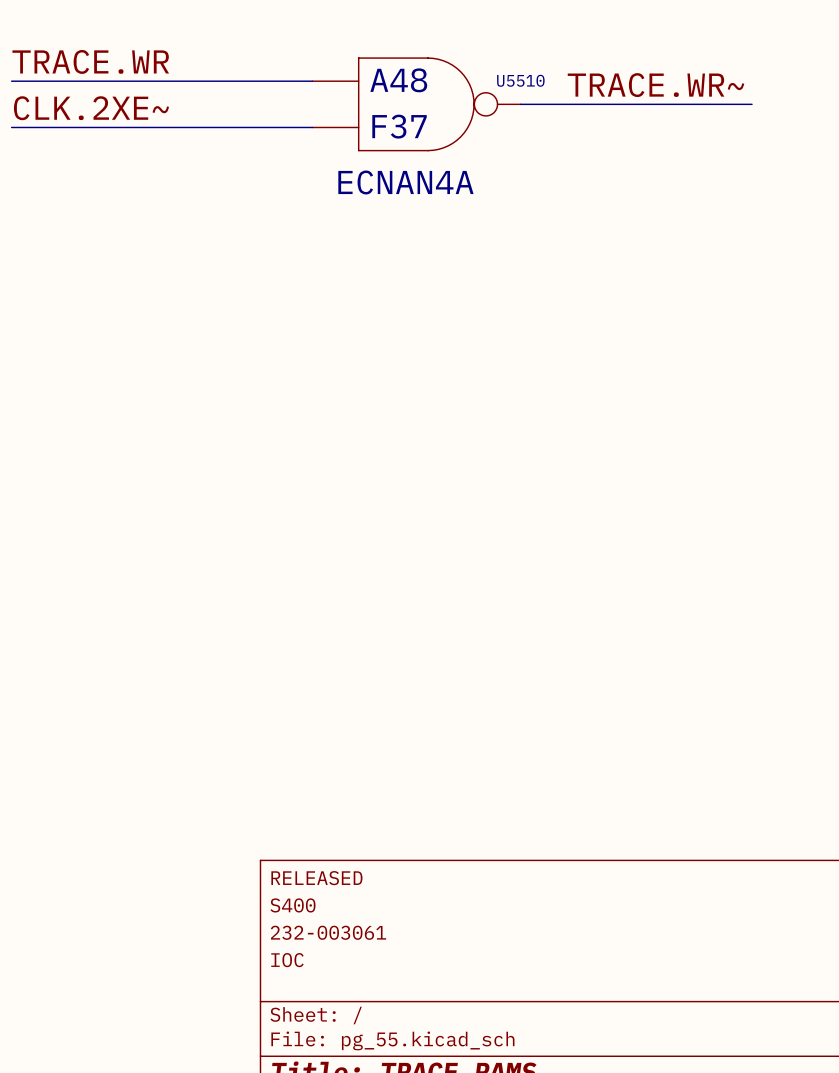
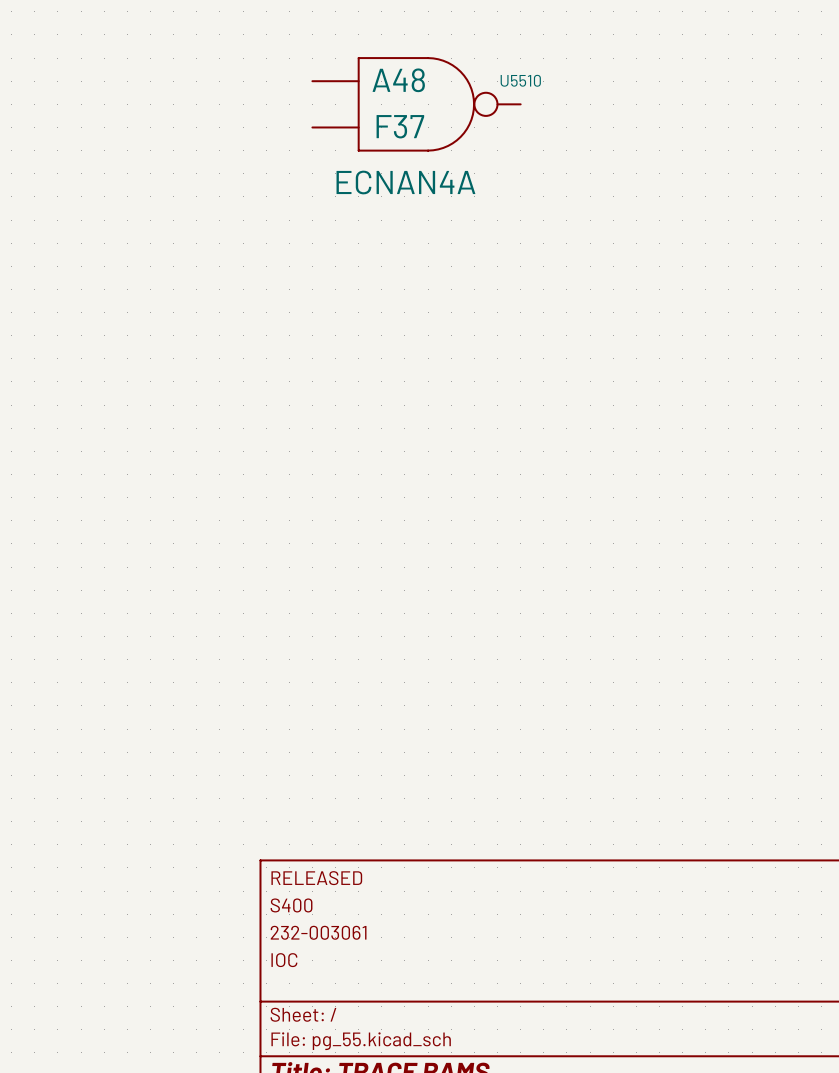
label: TRACE.WR (90, 61) -> none
wire: (11, 81) (312, 81) -> none
label: TRACE.WR~ (655, 85) -> none
wire: (520, 104) (752, 104) -> none
label: CLK.2XE~ (91, 108) -> none
wire: (11, 127) (312, 127) -> none

